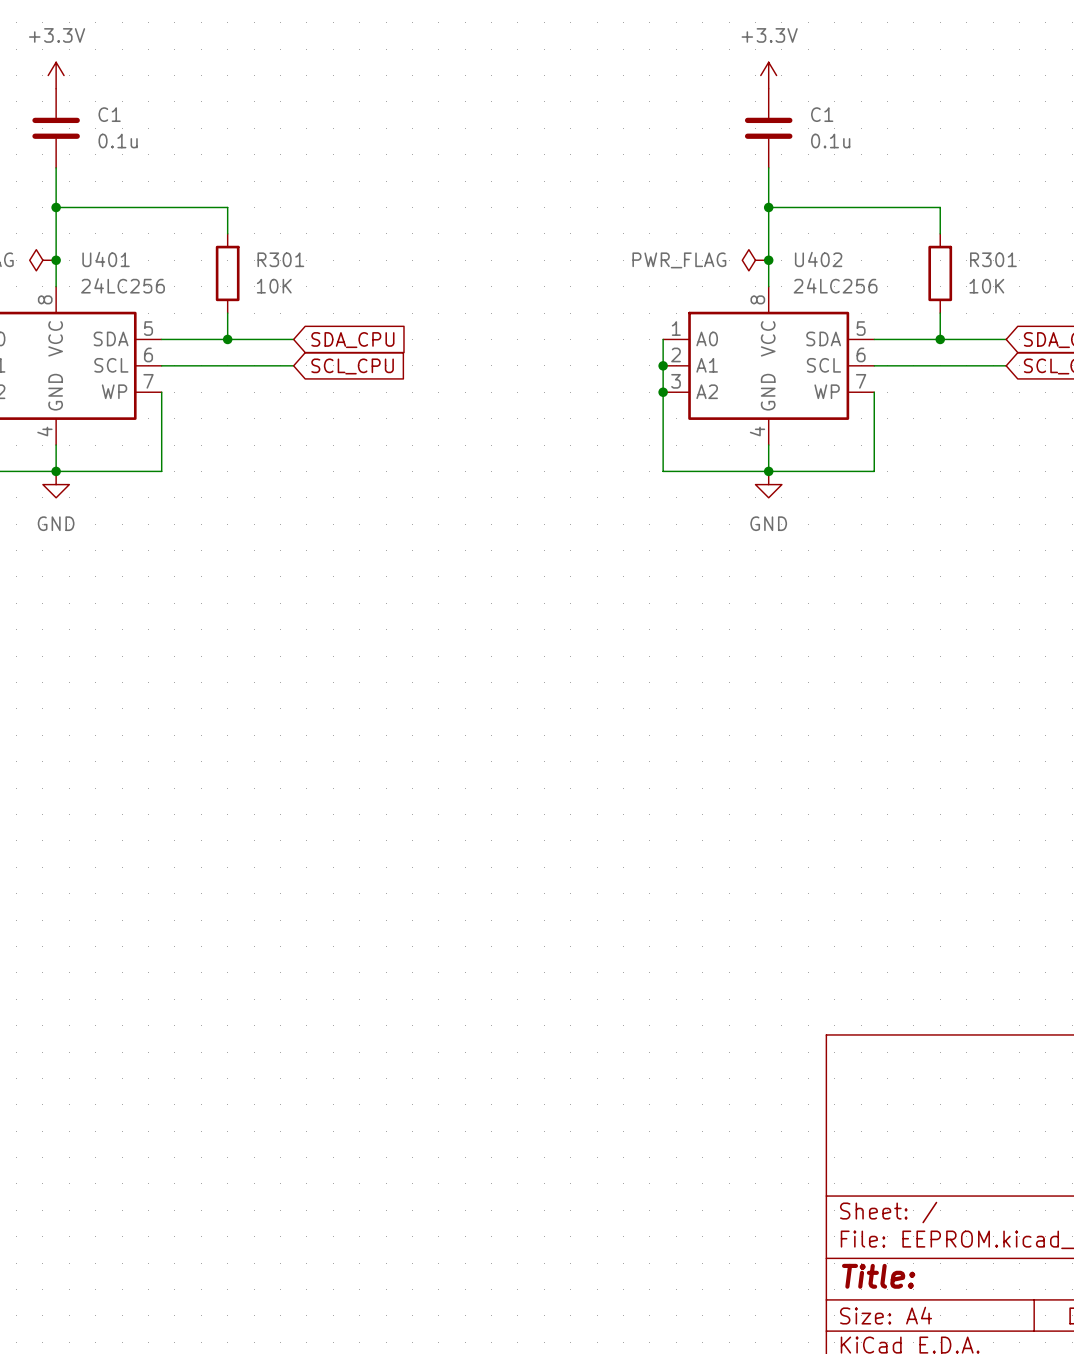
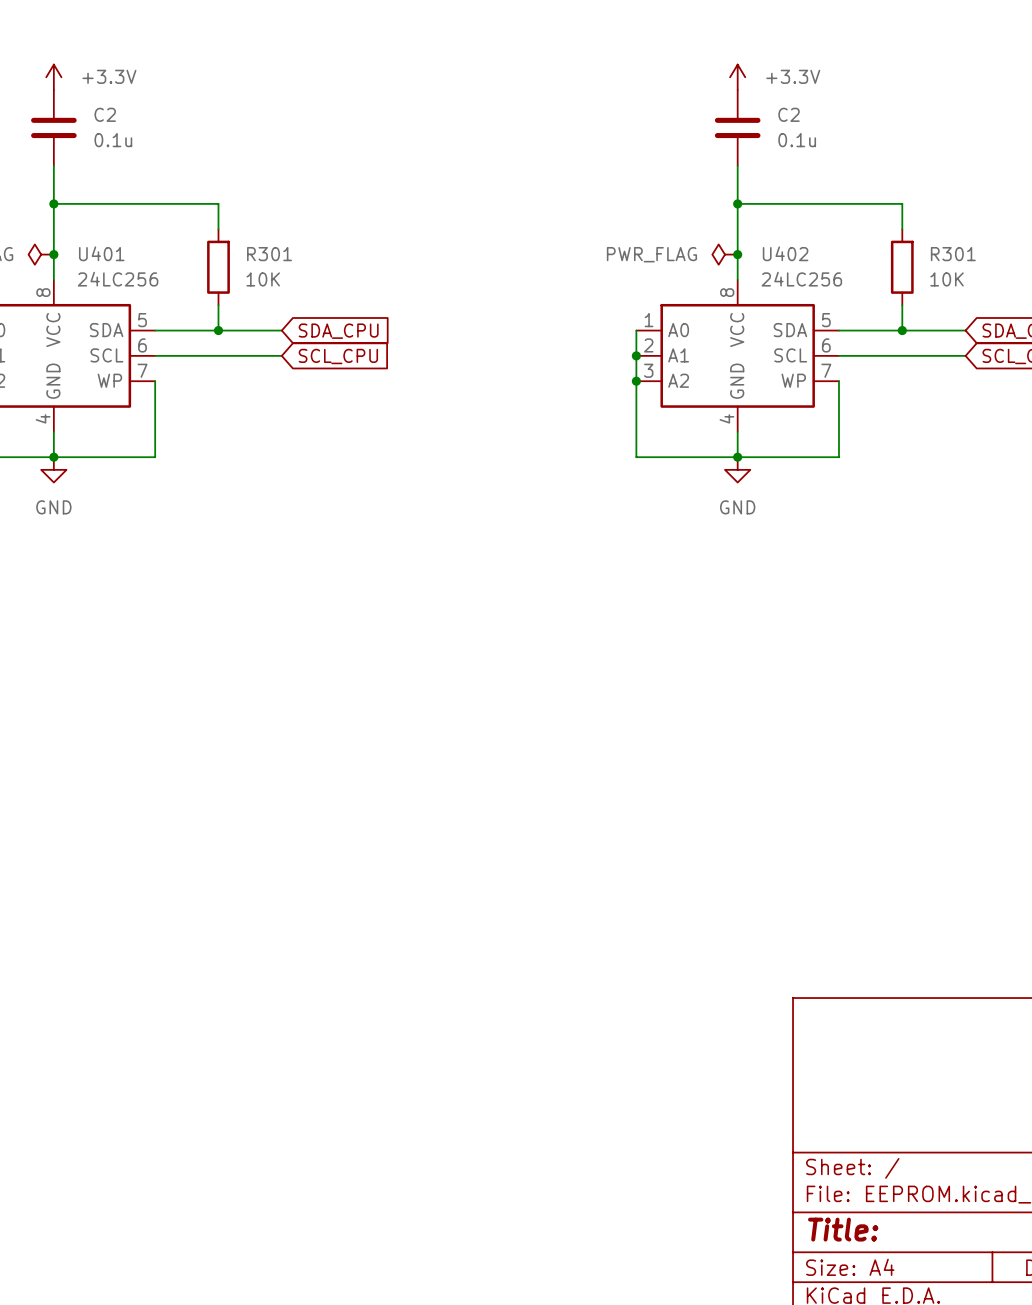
power symbol text position: +3.3V (57, 35) -> +3.3V (109, 76)
power symbol text position: +3.3V (769, 35) -> +3.3V (793, 76)
C1 name: C1 (109, 114) -> C2 (105, 114)
C1 name: C1 (822, 114) -> C2 (789, 114)

